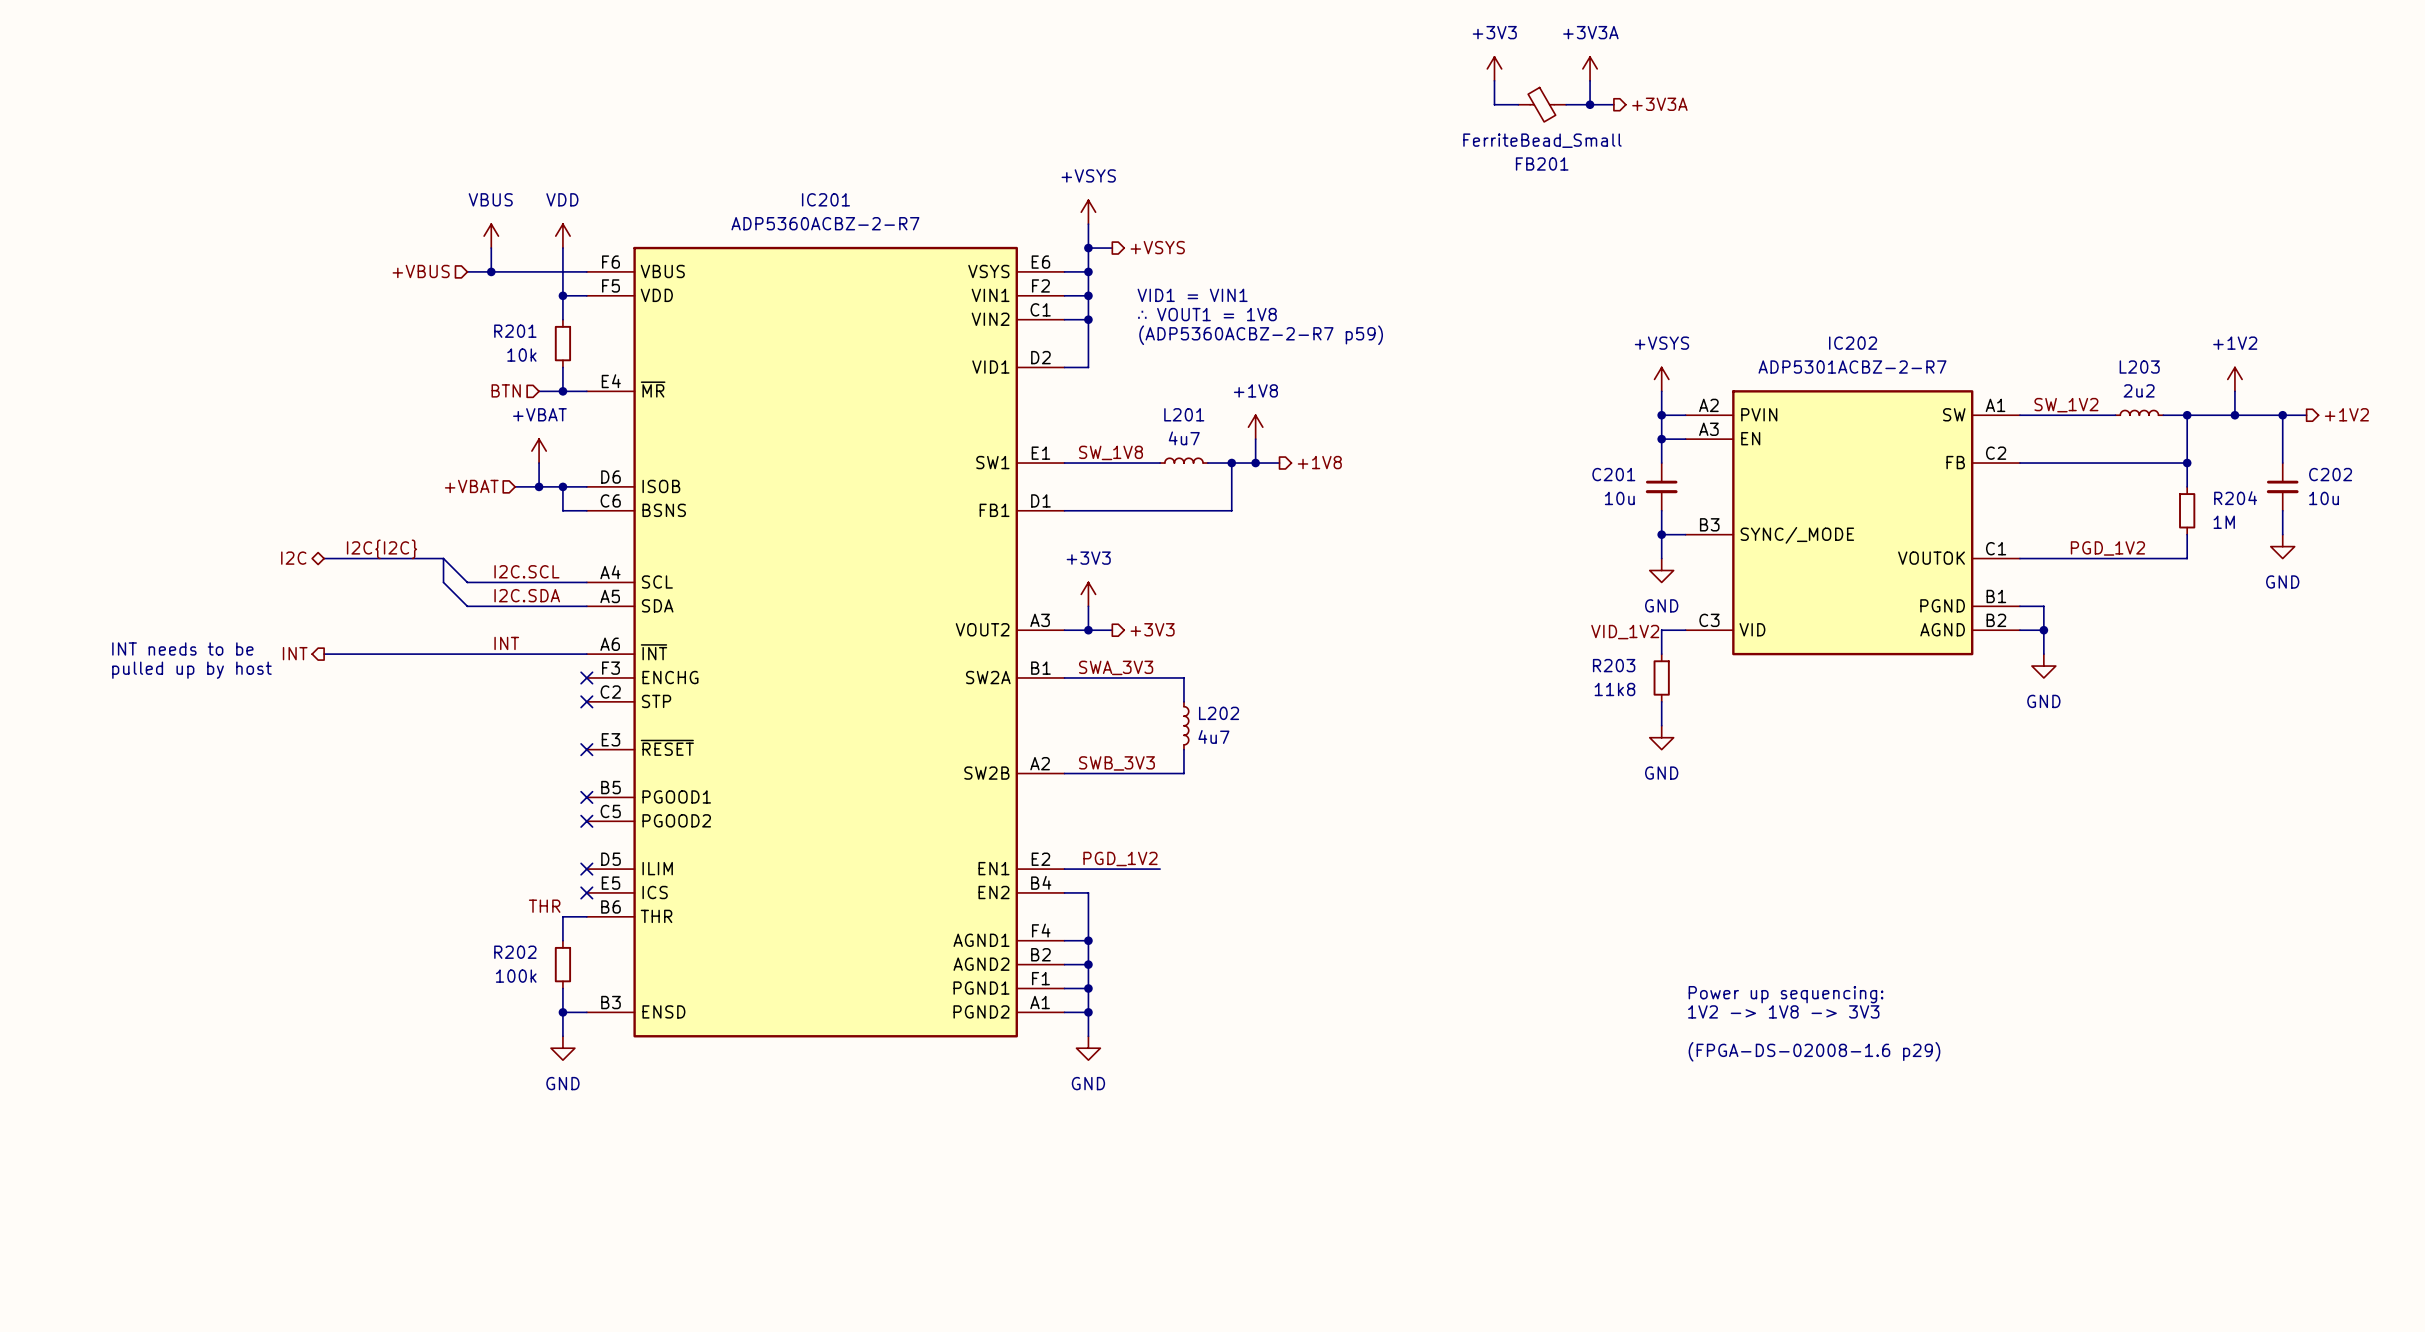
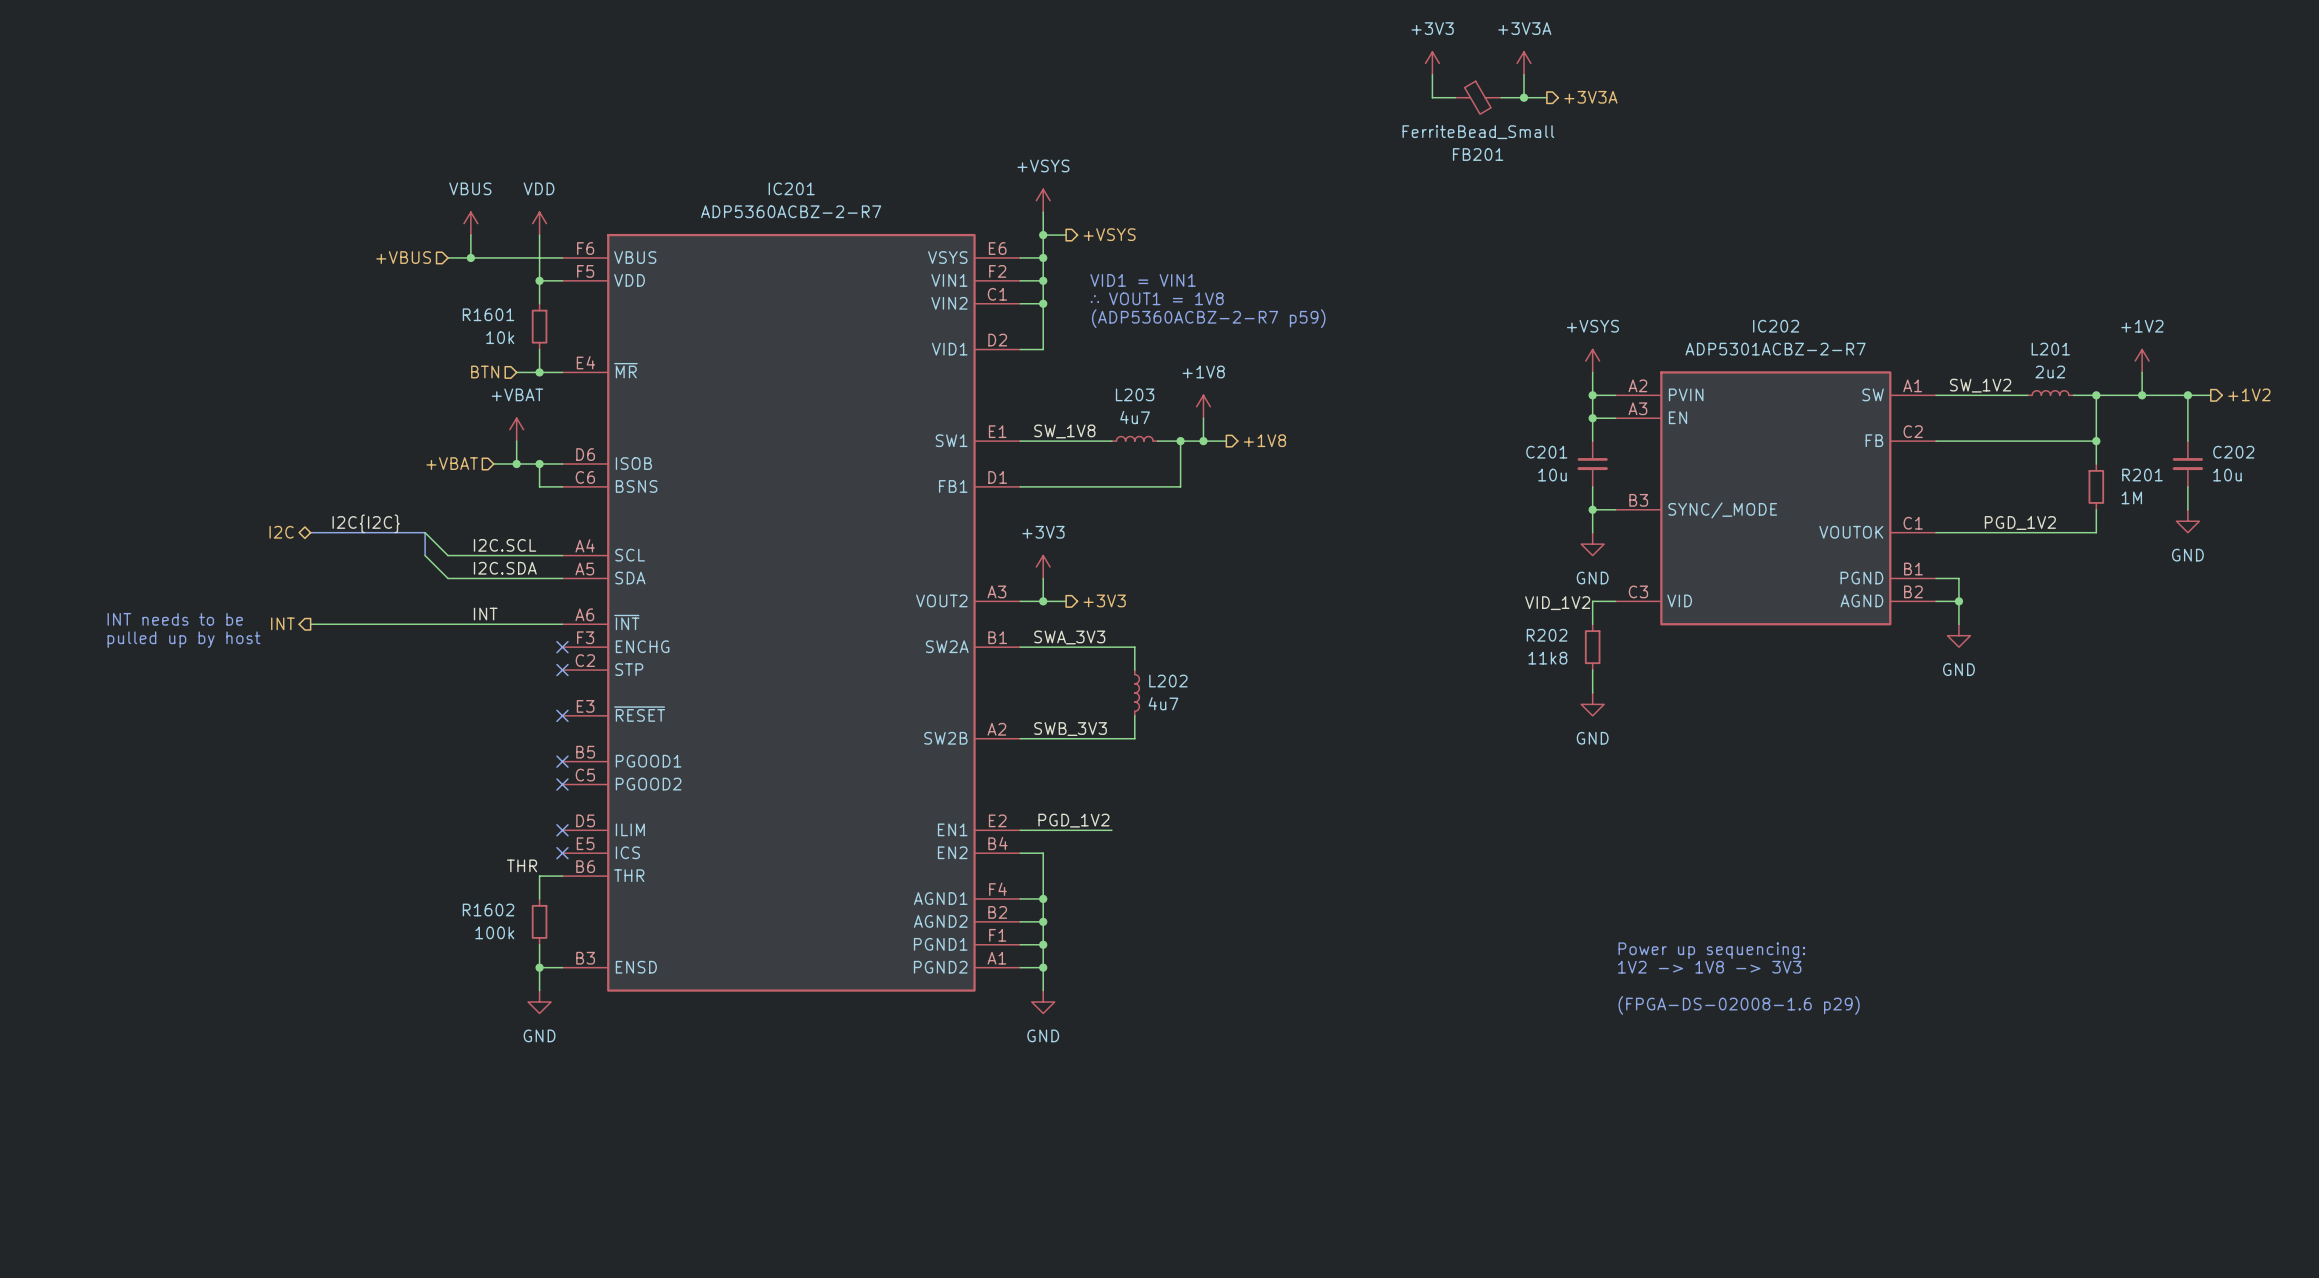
R201 name: R201 (515, 331) -> R1601 (488, 314)
L203 name: L203 (2139, 367) -> L201 (2050, 349)
L201 name: L201 (1184, 414) -> L203 (1135, 394)
R204 name: R204 (2235, 498) -> R201 (2142, 475)
R203 name: R203 (1614, 665) -> R202 (1547, 635)
R202 name: R202 (515, 952) -> R1602 (488, 910)

